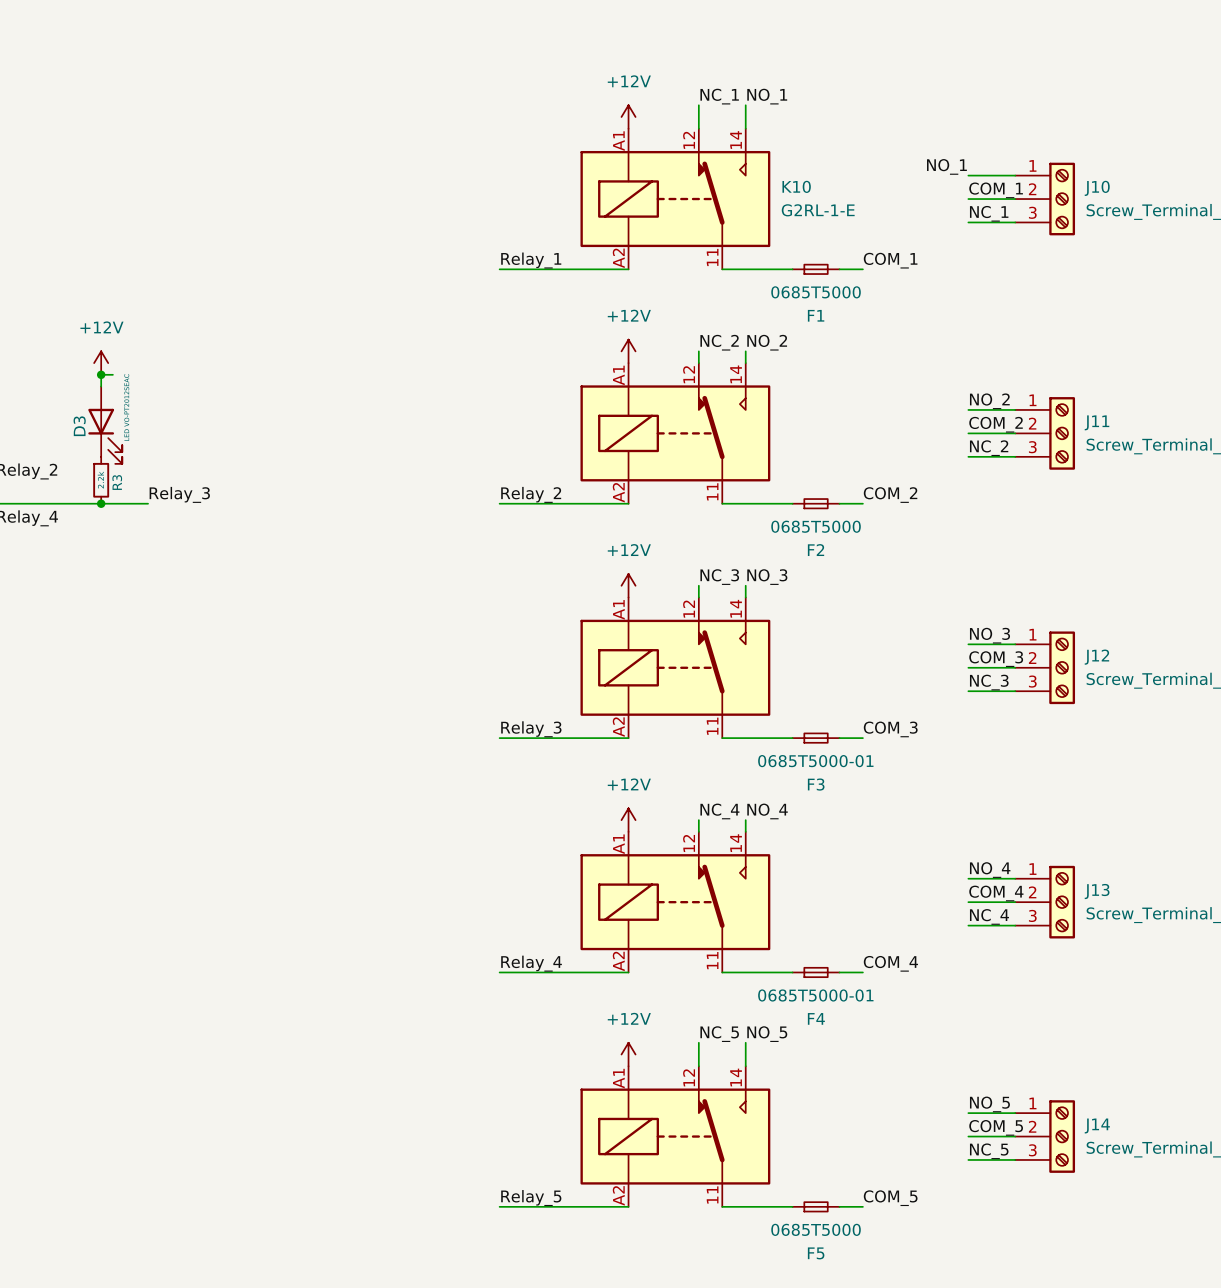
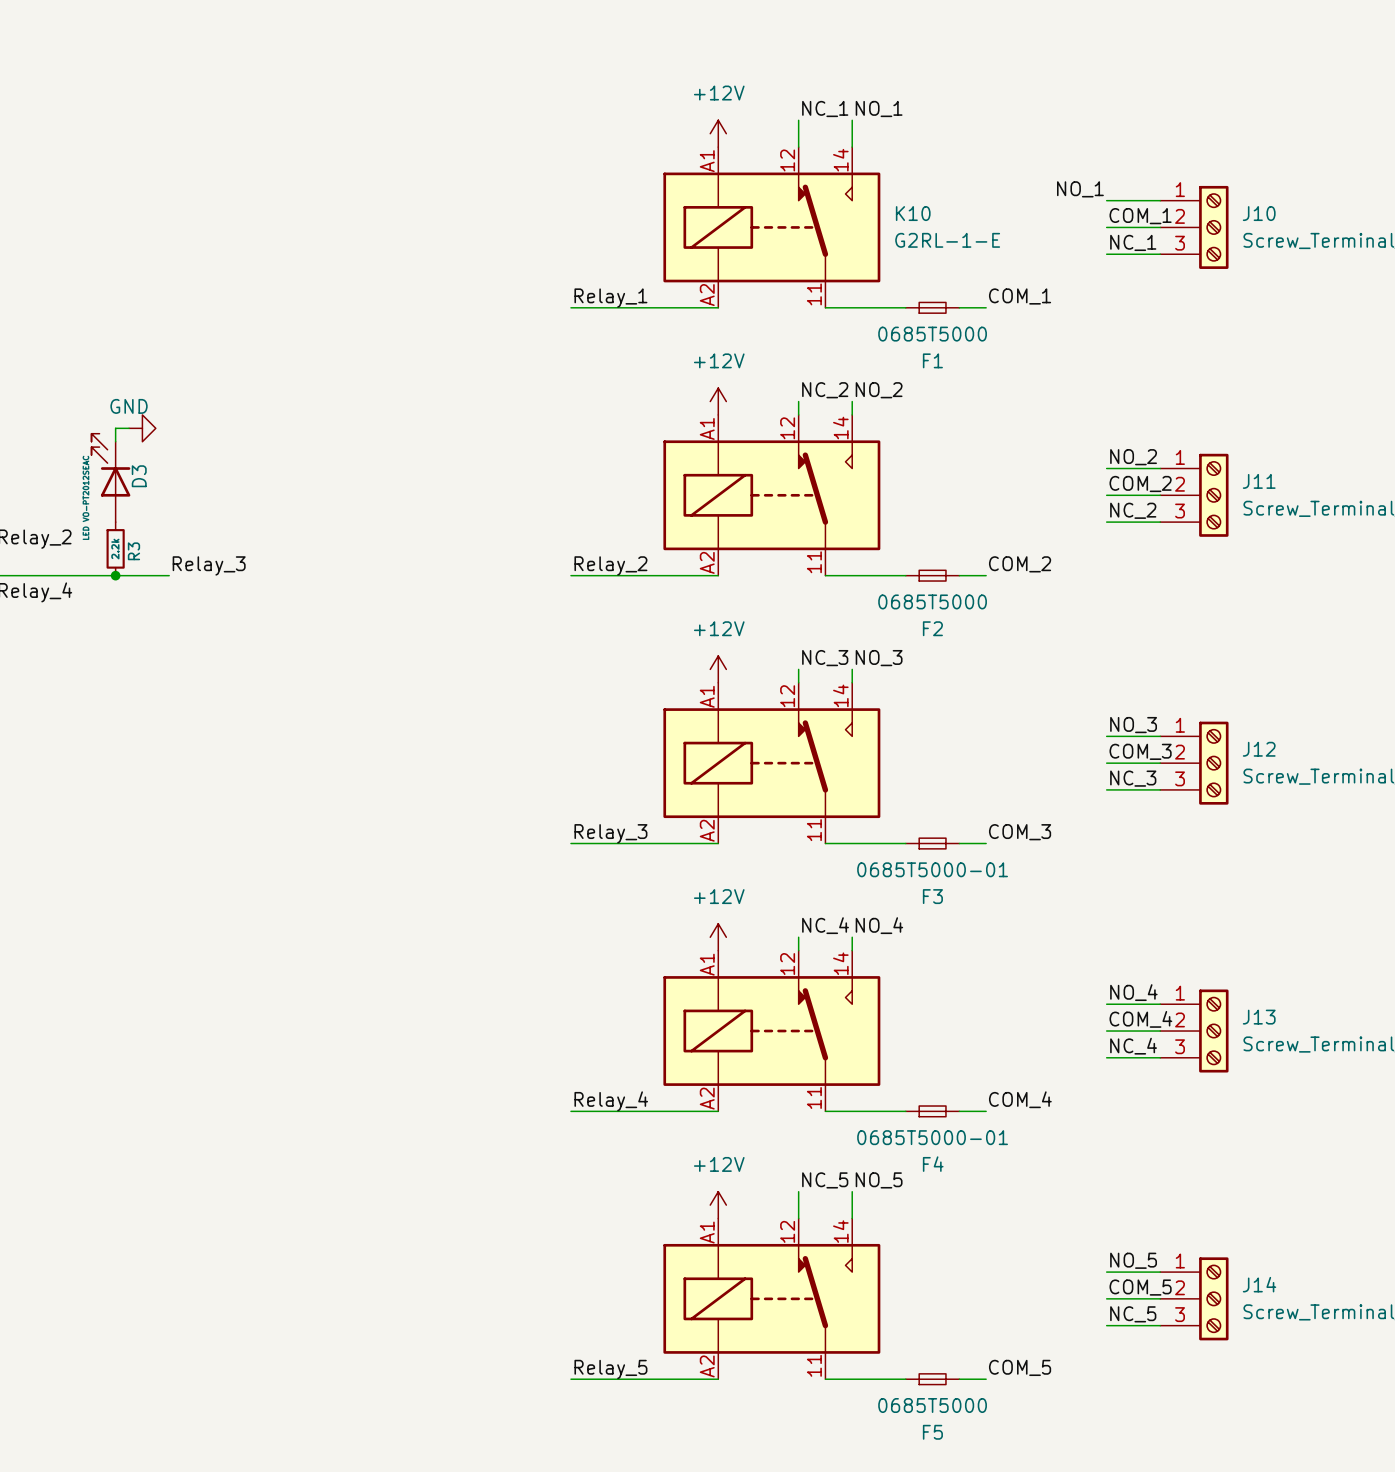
power symbol: +12V (101, 363) -> none
junction: (101, 374) -> none
power symbol: none -> GND (142, 428)
D3 rotation: 0° (105, 436) -> 180° (110, 465)

